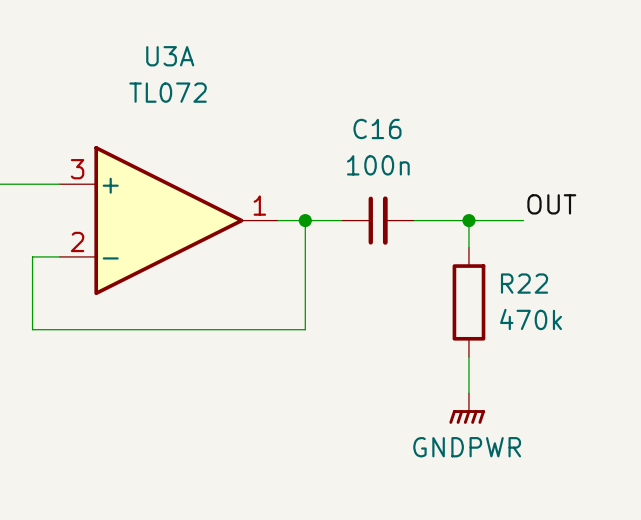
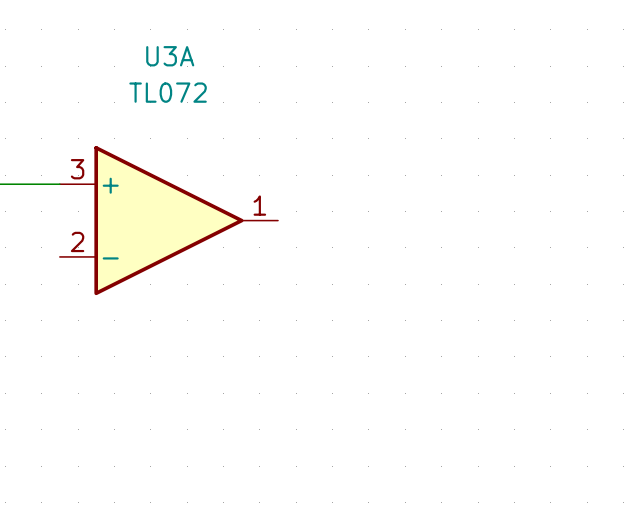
label: OUT (551, 204) -> none
wire: (278, 220) (341, 220) -> none
wire: (305, 220) (305, 329) (32, 329) (32, 256) (59, 256) -> none
junction: (305, 220) -> none
C16: 100n (378, 220) -> none
wire: (414, 220) (523, 220) -> none
wire: (468, 220) (468, 247) -> none
junction: (468, 220) -> none
R22: 470k (468, 302) -> none
wire: (468, 356) (468, 393) -> none
power symbol: GNDPWR (467, 408) -> none

